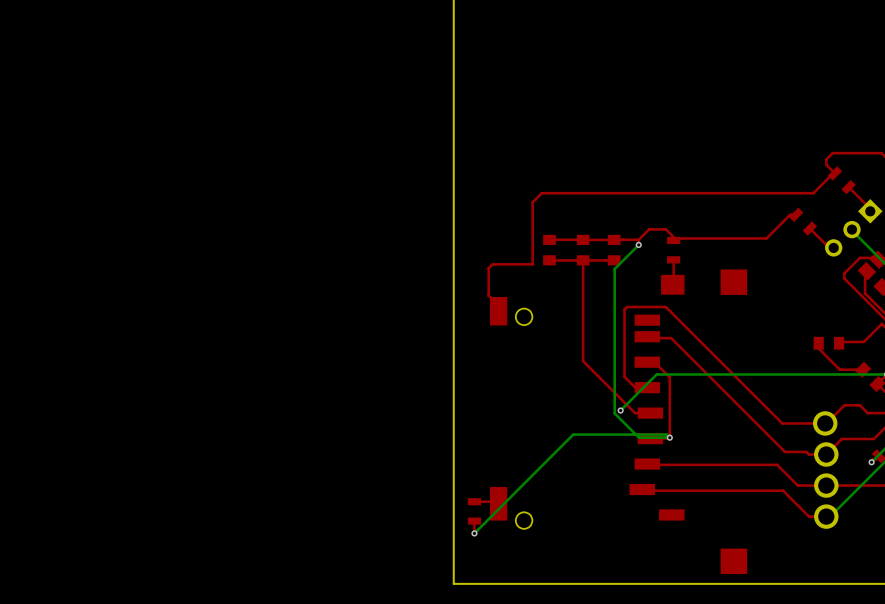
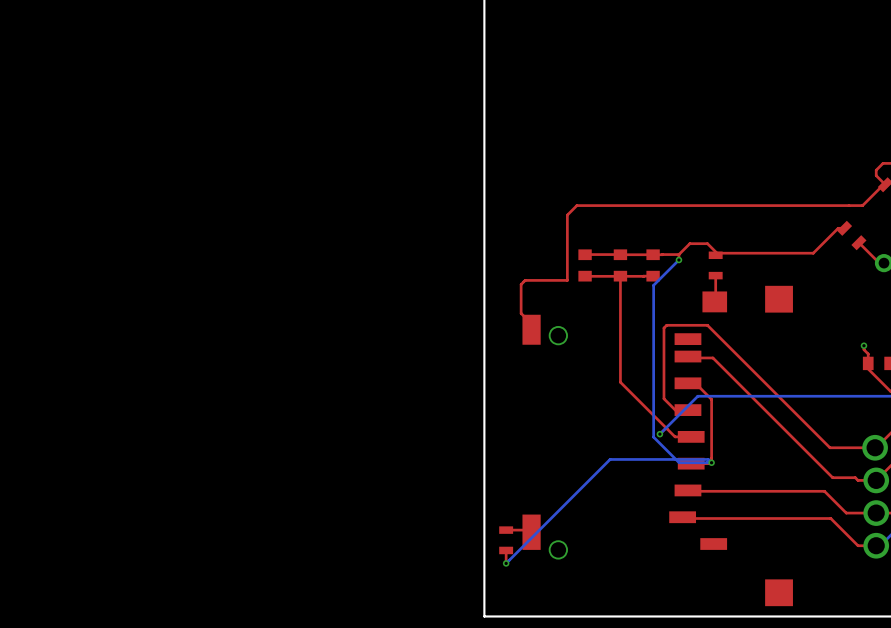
top track: none -> (863, 345) (863, 349) (868, 353) (868, 363)
via: none -> (863, 345)

